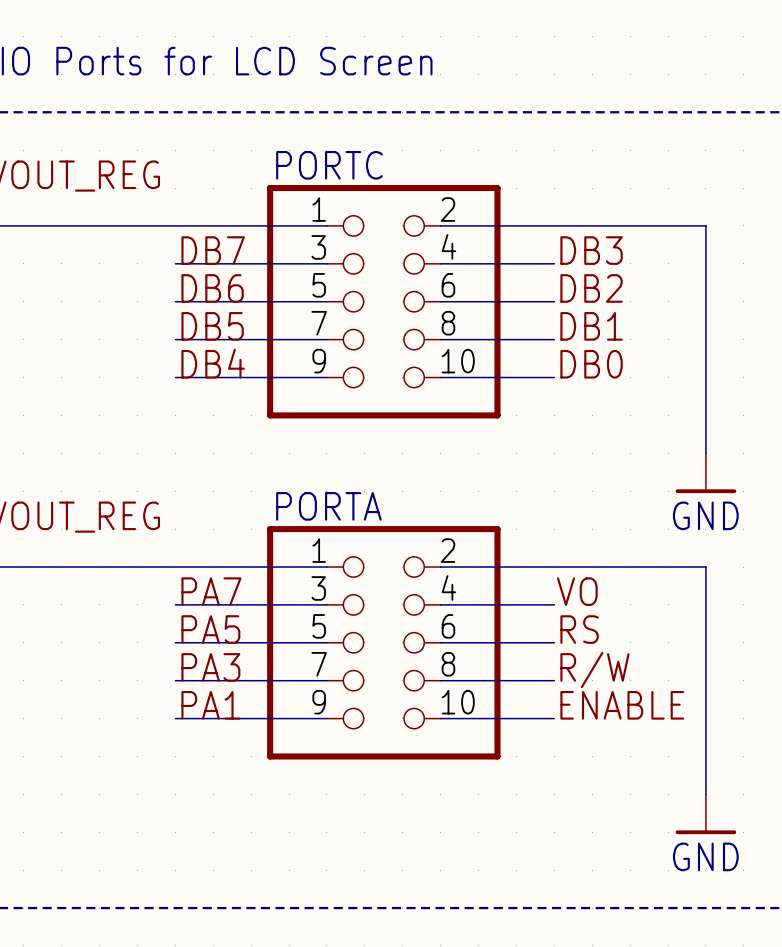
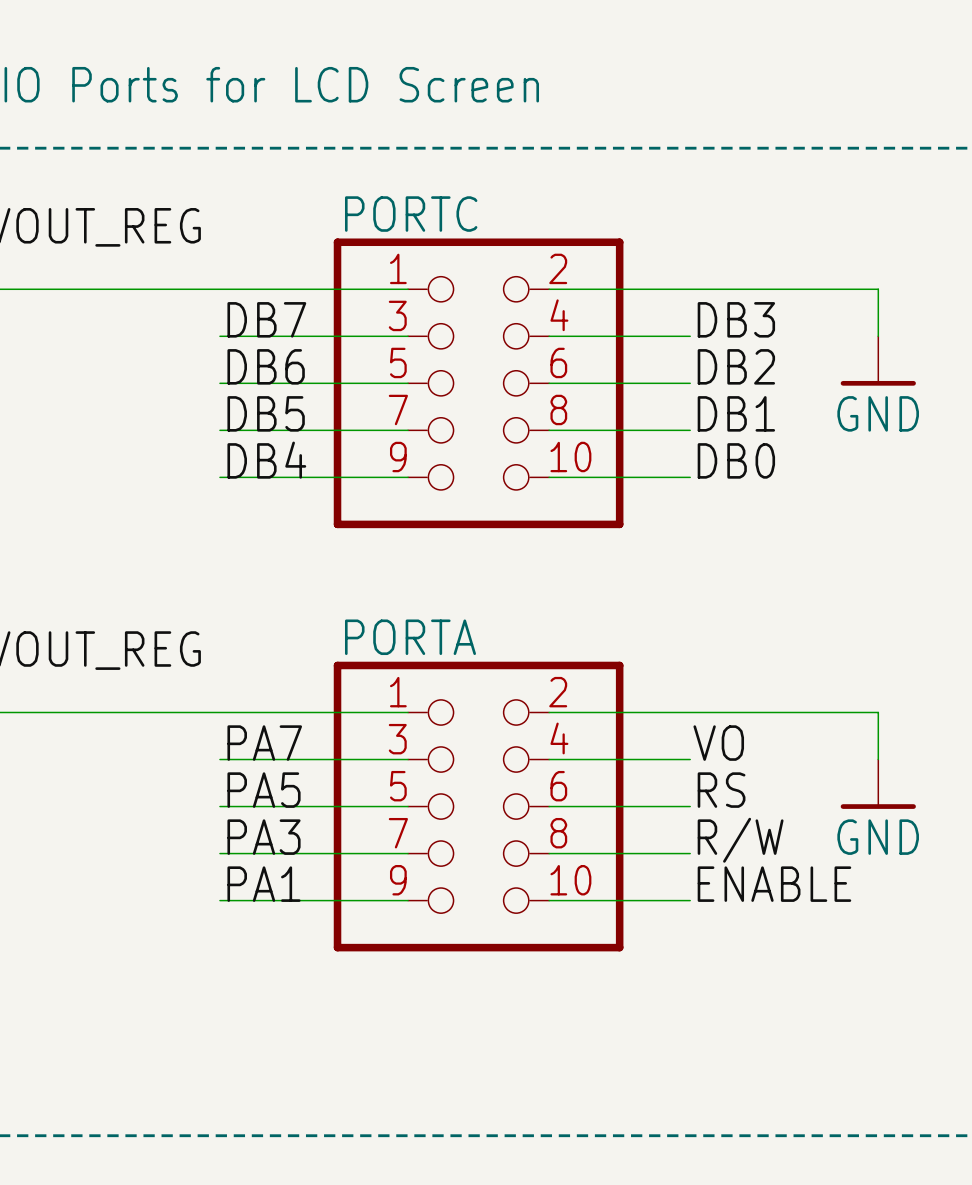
wire: (705, 263) (705, 453) -> none
power symbol: none -> GND (878, 360)
power symbol: GND (705, 473) -> none
wire: (705, 604) (705, 794) -> none
power symbol: none -> GND (878, 784)
power symbol: GND (705, 814) -> none

